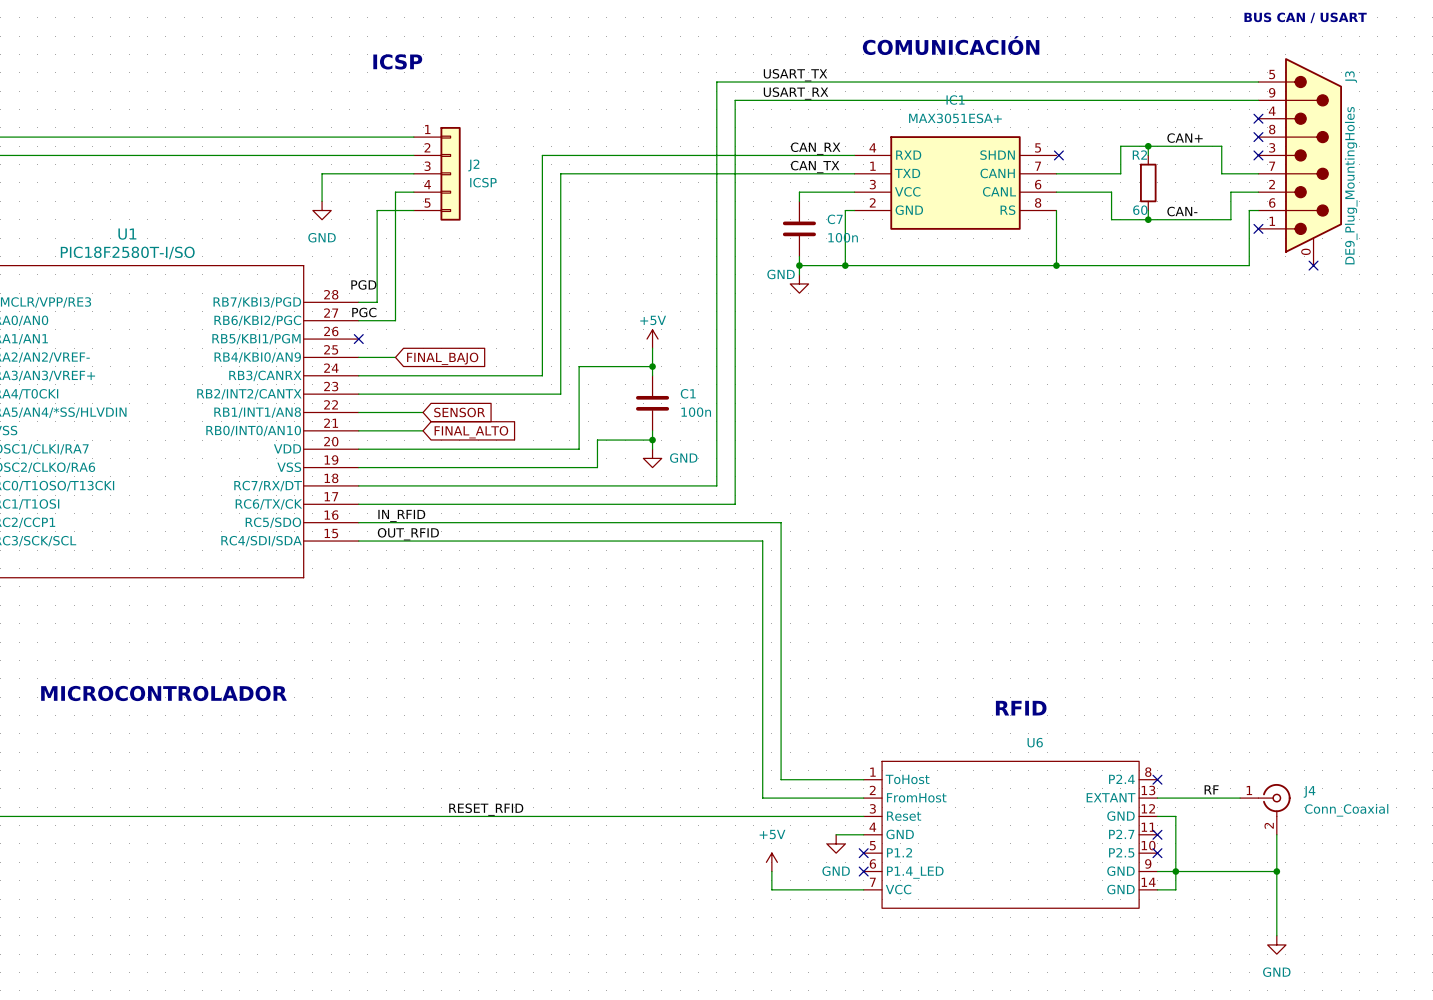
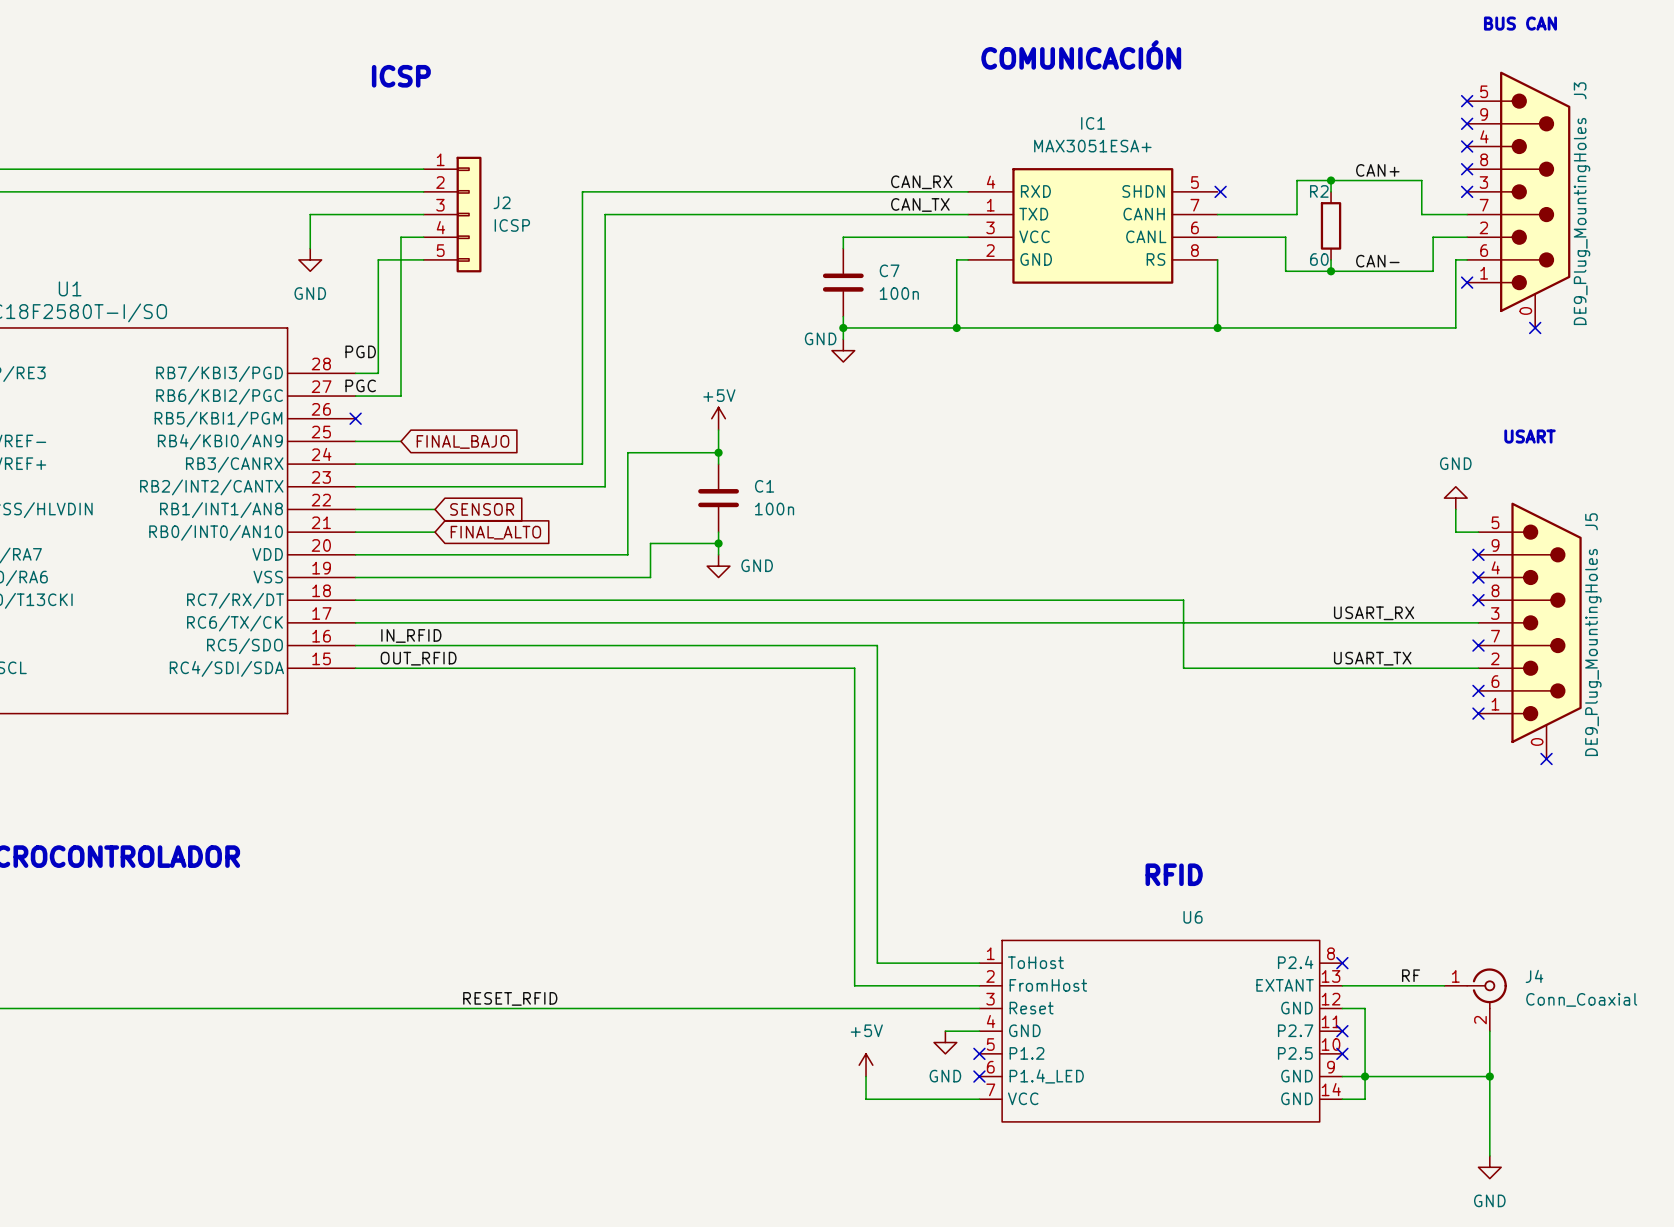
text: BUS CAN / USART (1305, 17) -> BUS CAN (1520, 23)
label: USART_TX (795, 75) -> none
wire: (1258, 82) (716, 82) (716, 485) -> (1478, 668) (1183, 668) (1183, 600) (797, 600)
no-connect mark: none -> (1467, 101)
label: USART_RX (796, 93) -> none
wire: (1258, 100) (735, 100) (735, 504) -> (1478, 622) (820, 622)
no-connect mark: none -> (1467, 123)
wire: (799, 192) (799, 201) -> (900, 237) (843, 237) (843, 248)
C7 position: (799, 228) -> (843, 282)
wire: (799, 256) (799, 274) -> (843, 316) (843, 339)
wire: none -> (843, 327) (900, 327)
junction: none -> (843, 327)
junction: (799, 265) -> none
power symbol position: GND (799, 283) -> GND (843, 350)
text: none -> USART (1530, 436)
power symbol: none -> GND (1455, 498)
wire: none -> (1455, 509) (1455, 532) (1478, 532)
no-connect mark: none -> (1478, 554)
no-connect mark: none -> (1478, 577)
no-connect mark: none -> (1478, 600)
label: none -> USART_RX (1374, 613)
J5: none -> DE9_Plug_MountingHoles (1530, 630)
no-connect mark: none -> (1478, 645)
label: none -> USART_TX (1372, 658)
no-connect mark: none -> (1478, 690)
no-connect mark: none -> (1478, 713)
no-connect mark: none -> (1546, 758)

